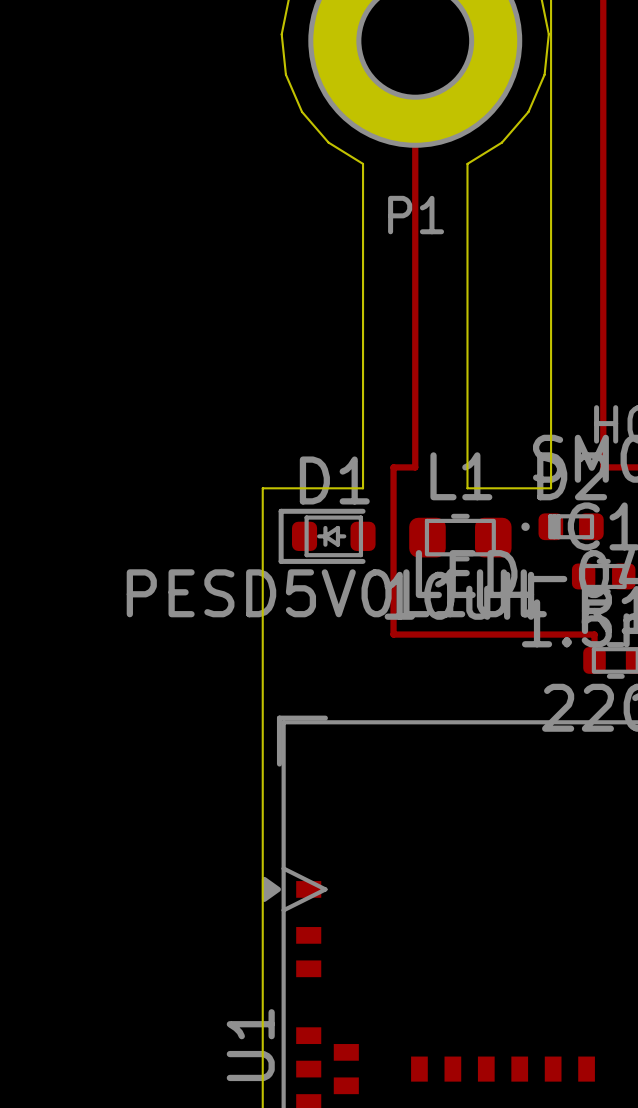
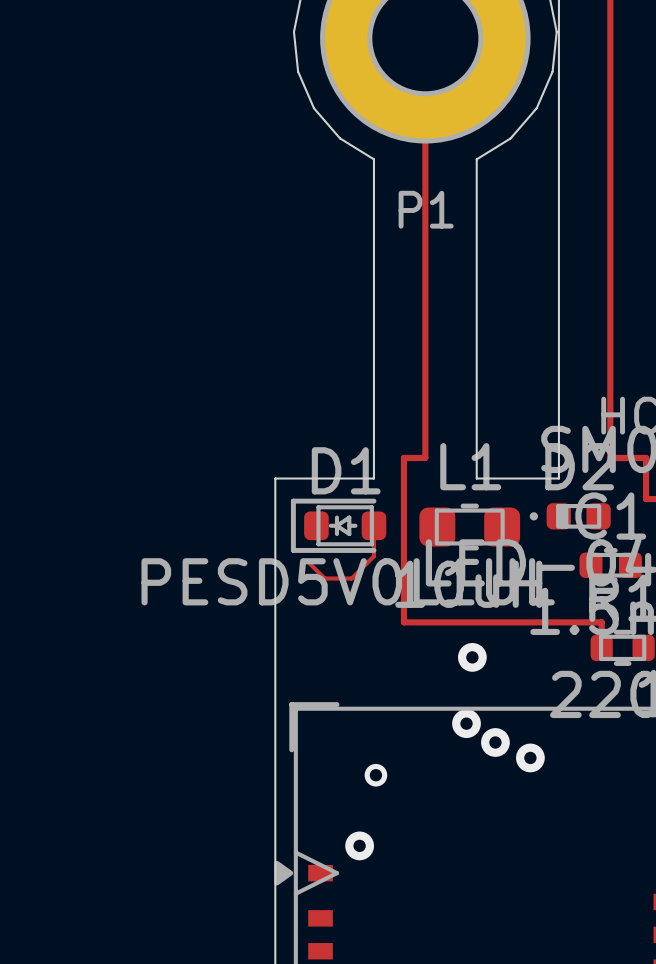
track: none -> (373, 525) (373, 556) (351, 578) (324, 578) (308, 562)
via: none -> (472, 657)
via: none -> (466, 723)
via: none -> (495, 742)
via: none -> (530, 757)
via: none -> (375, 775)
via: none -> (359, 845)

